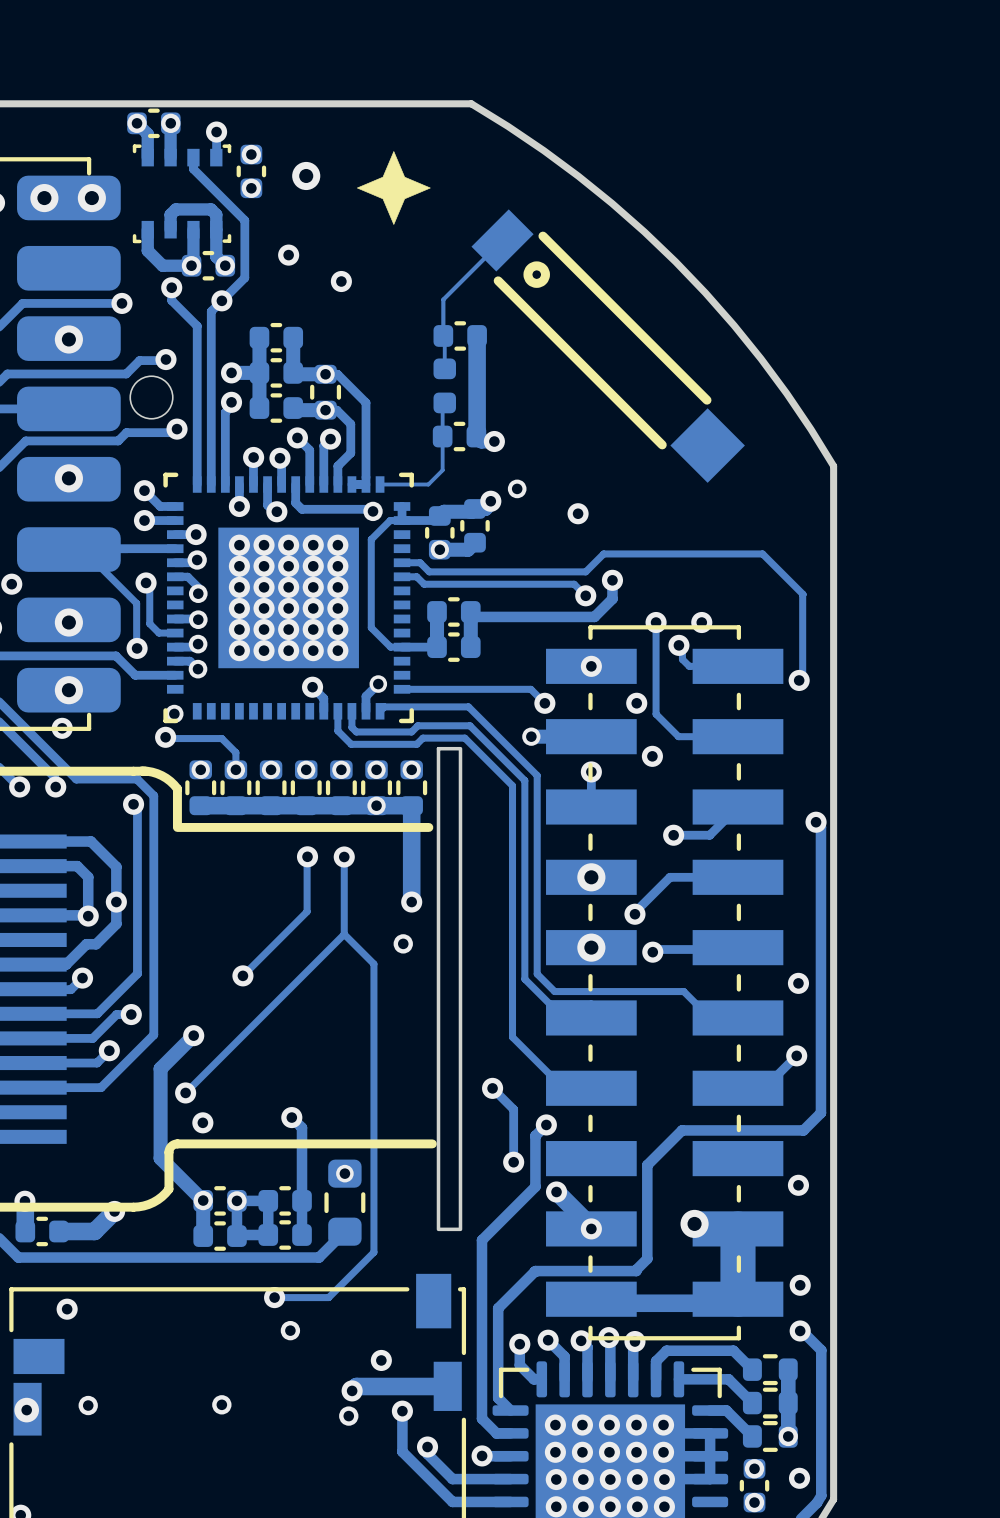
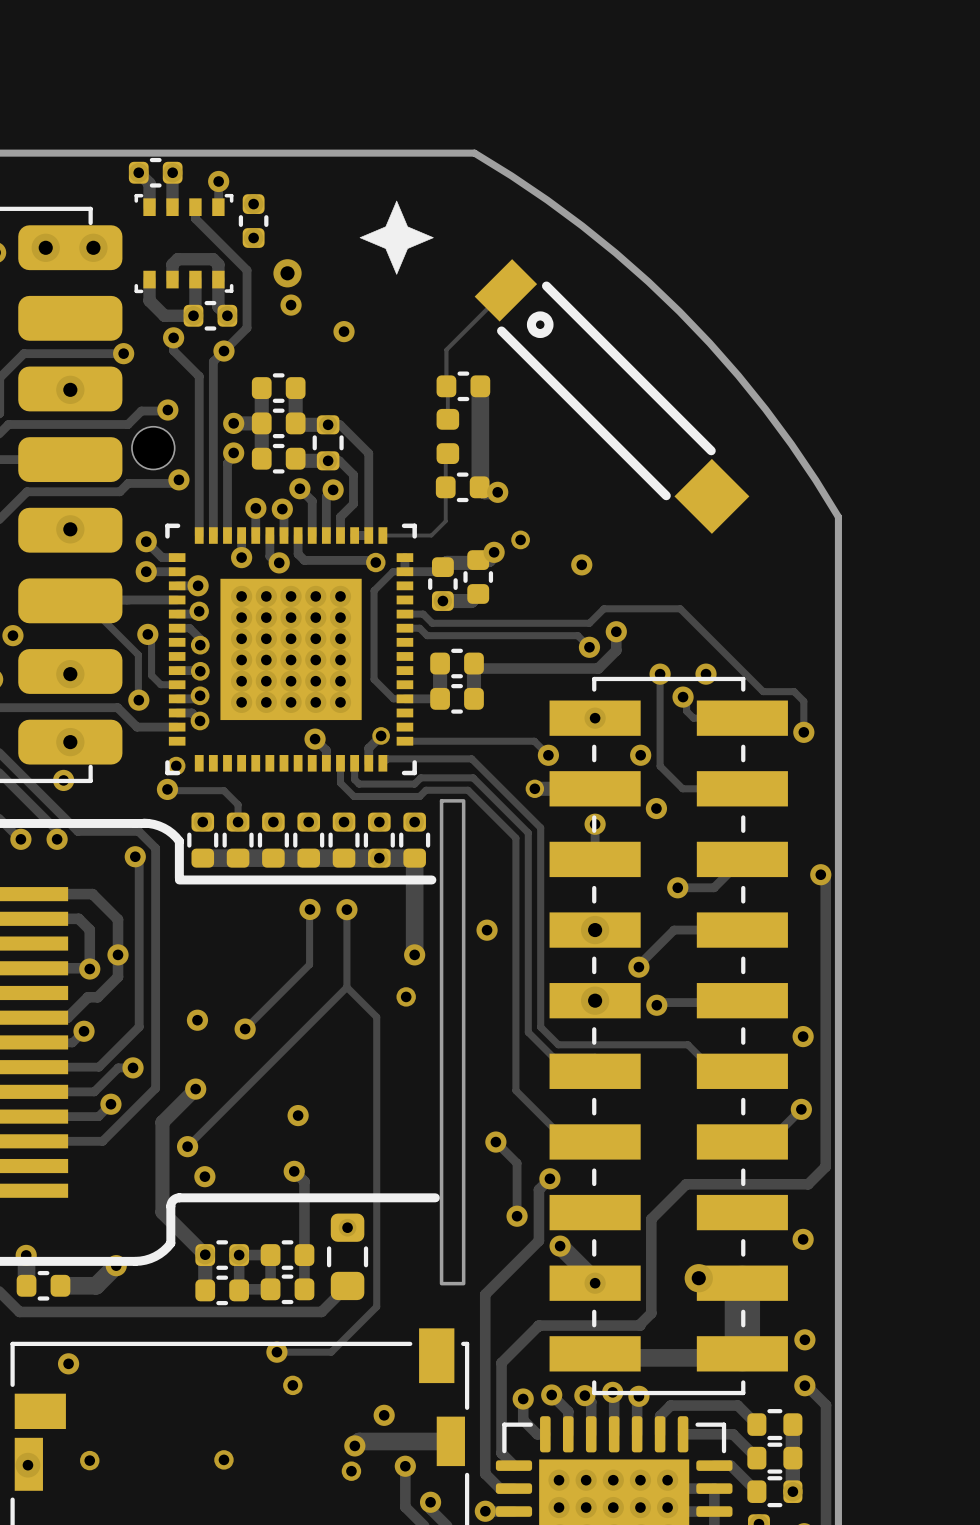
via position: (306, 175) -> (287, 273)
track: (600, 557) (603, 553) (762, 553) (803, 594) -> (603, 608) (680, 608) (763, 691) (794, 691) (803, 701) (803, 732)
track: (802, 594) (802, 676) (799, 680) -> none
via: none -> (487, 930)
via: none -> (197, 1020)
via: none -> (298, 1115)

